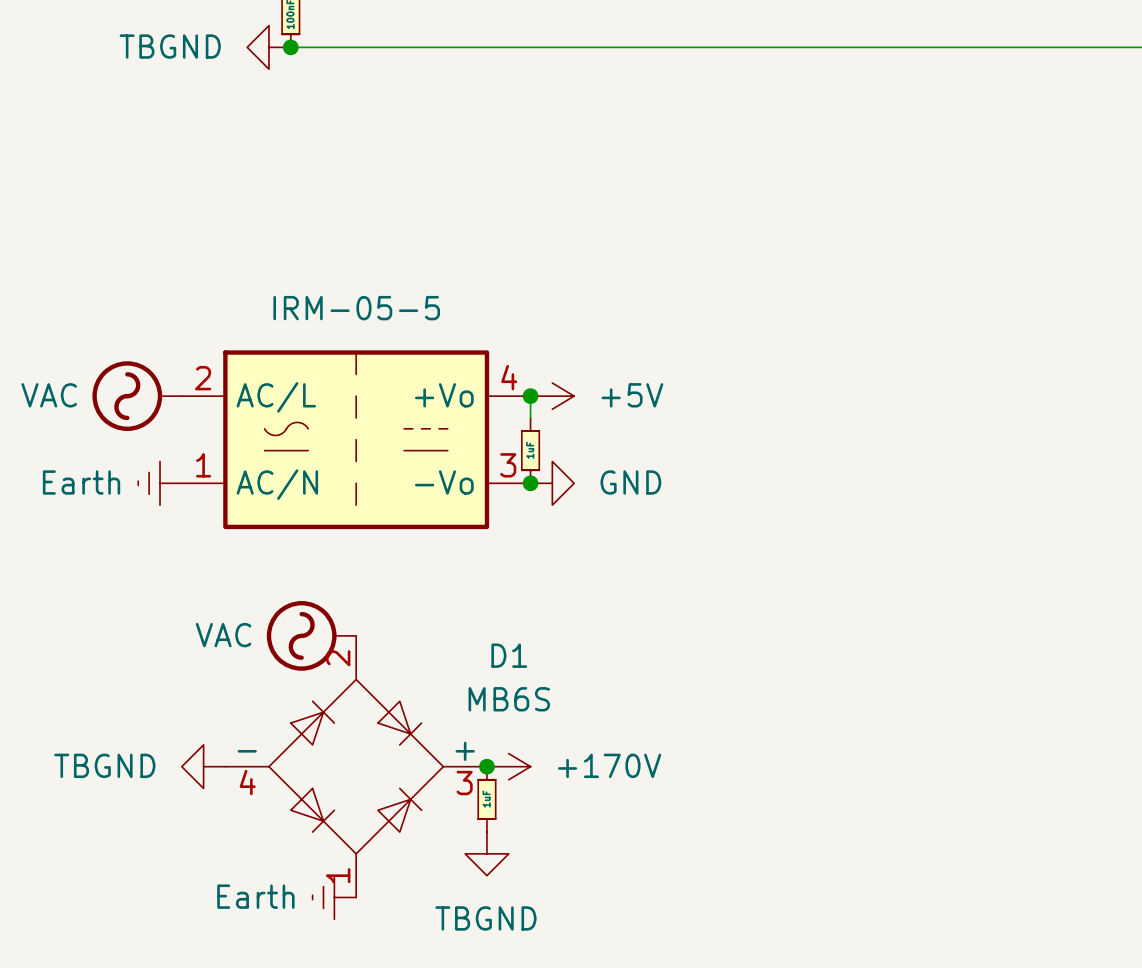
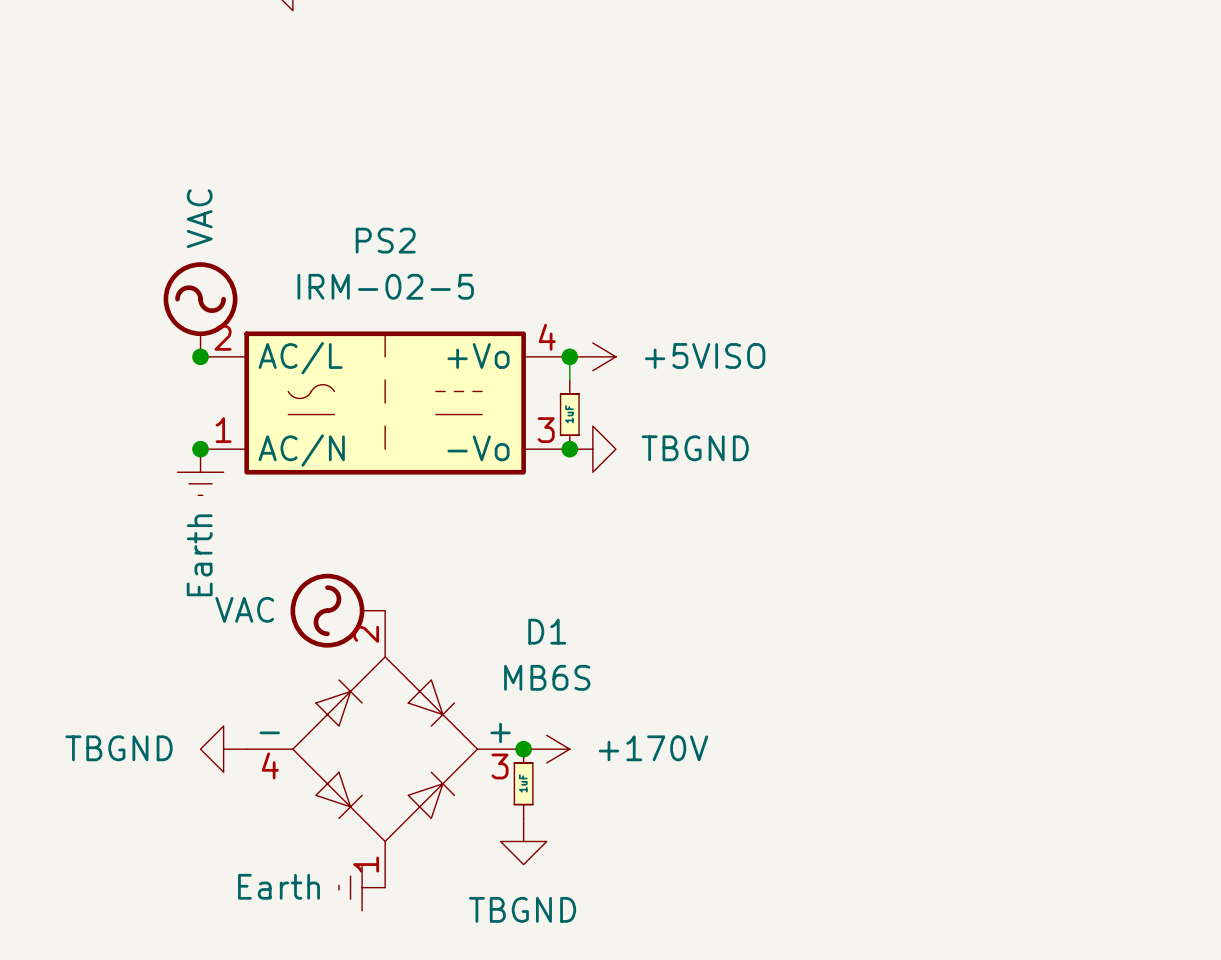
power symbol rotation: 0° (137, 396) -> 90° clockwise (200, 309)
power symbol position: VAC (137, 396) -> VAC (200, 309)
junction: none -> (200, 356)
power symbol: +5V (552, 396) -> +5VISO (592, 356)
part: IRM-05-5 (356, 439) -> none
PS2: none -> IRM-02-5 (385, 403)
power symbol rotation: 0° (160, 483) -> 90° counterclockwise (200, 472)
power symbol position: Earth (160, 483) -> Earth (200, 472)
junction: none -> (200, 449)
power symbol: GND (552, 483) -> TBGND (592, 449)

